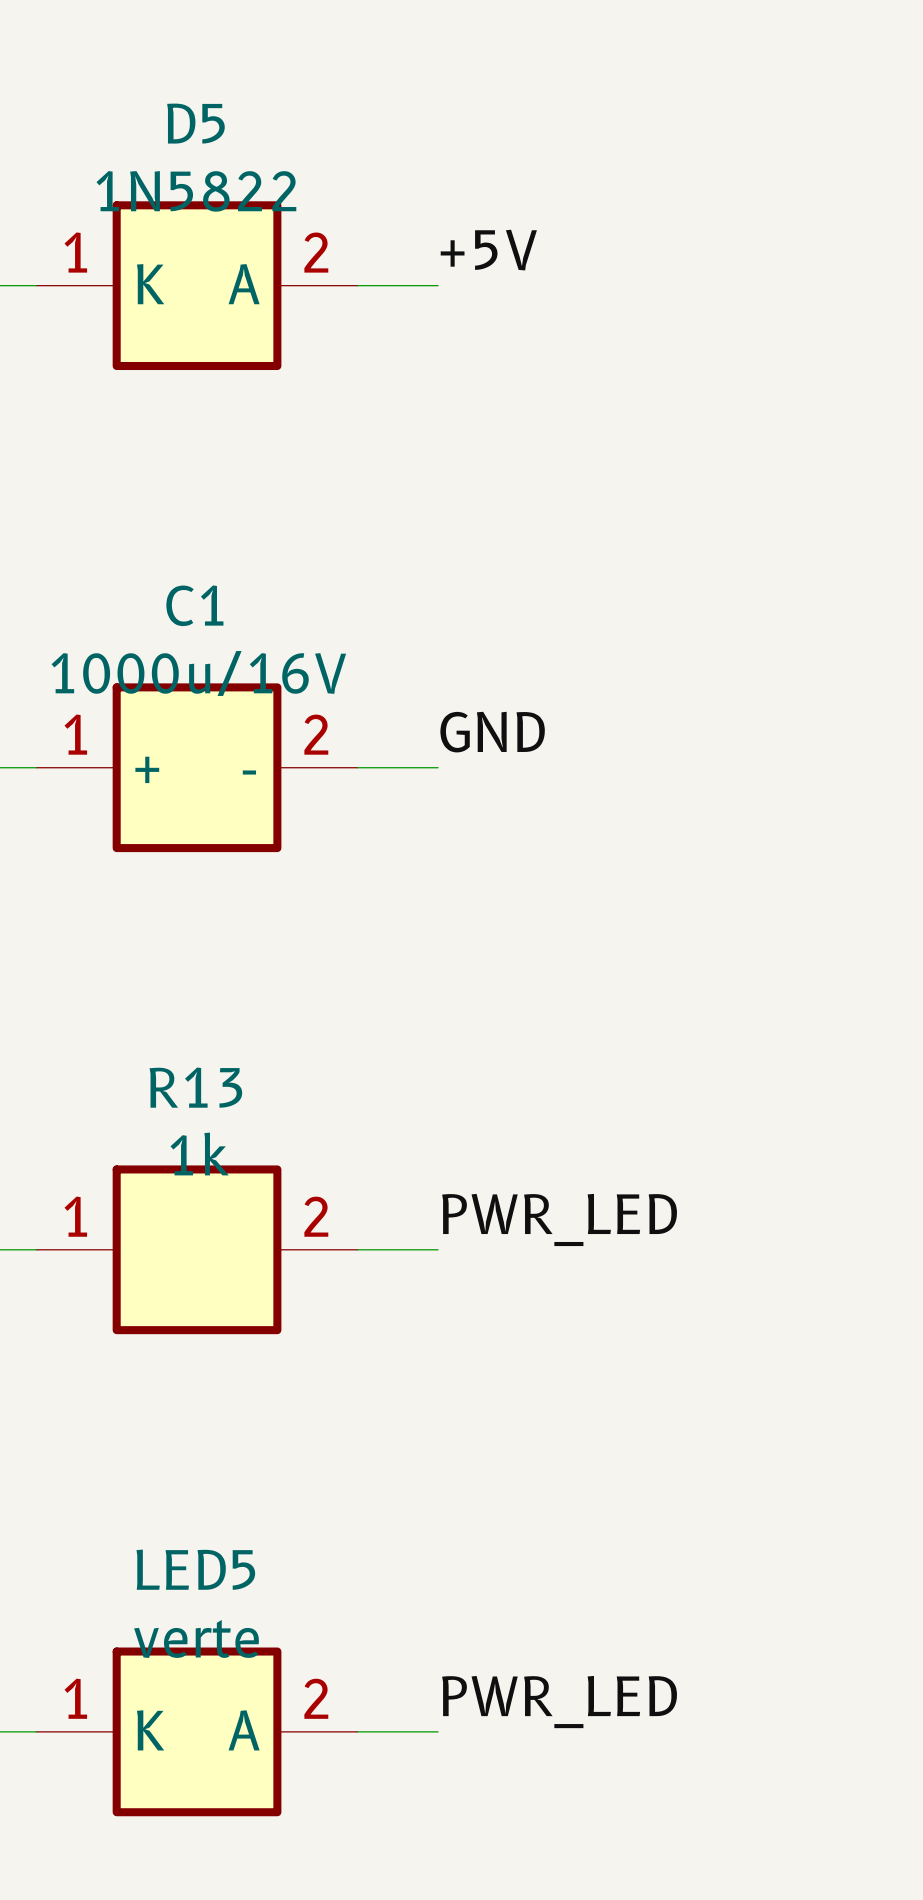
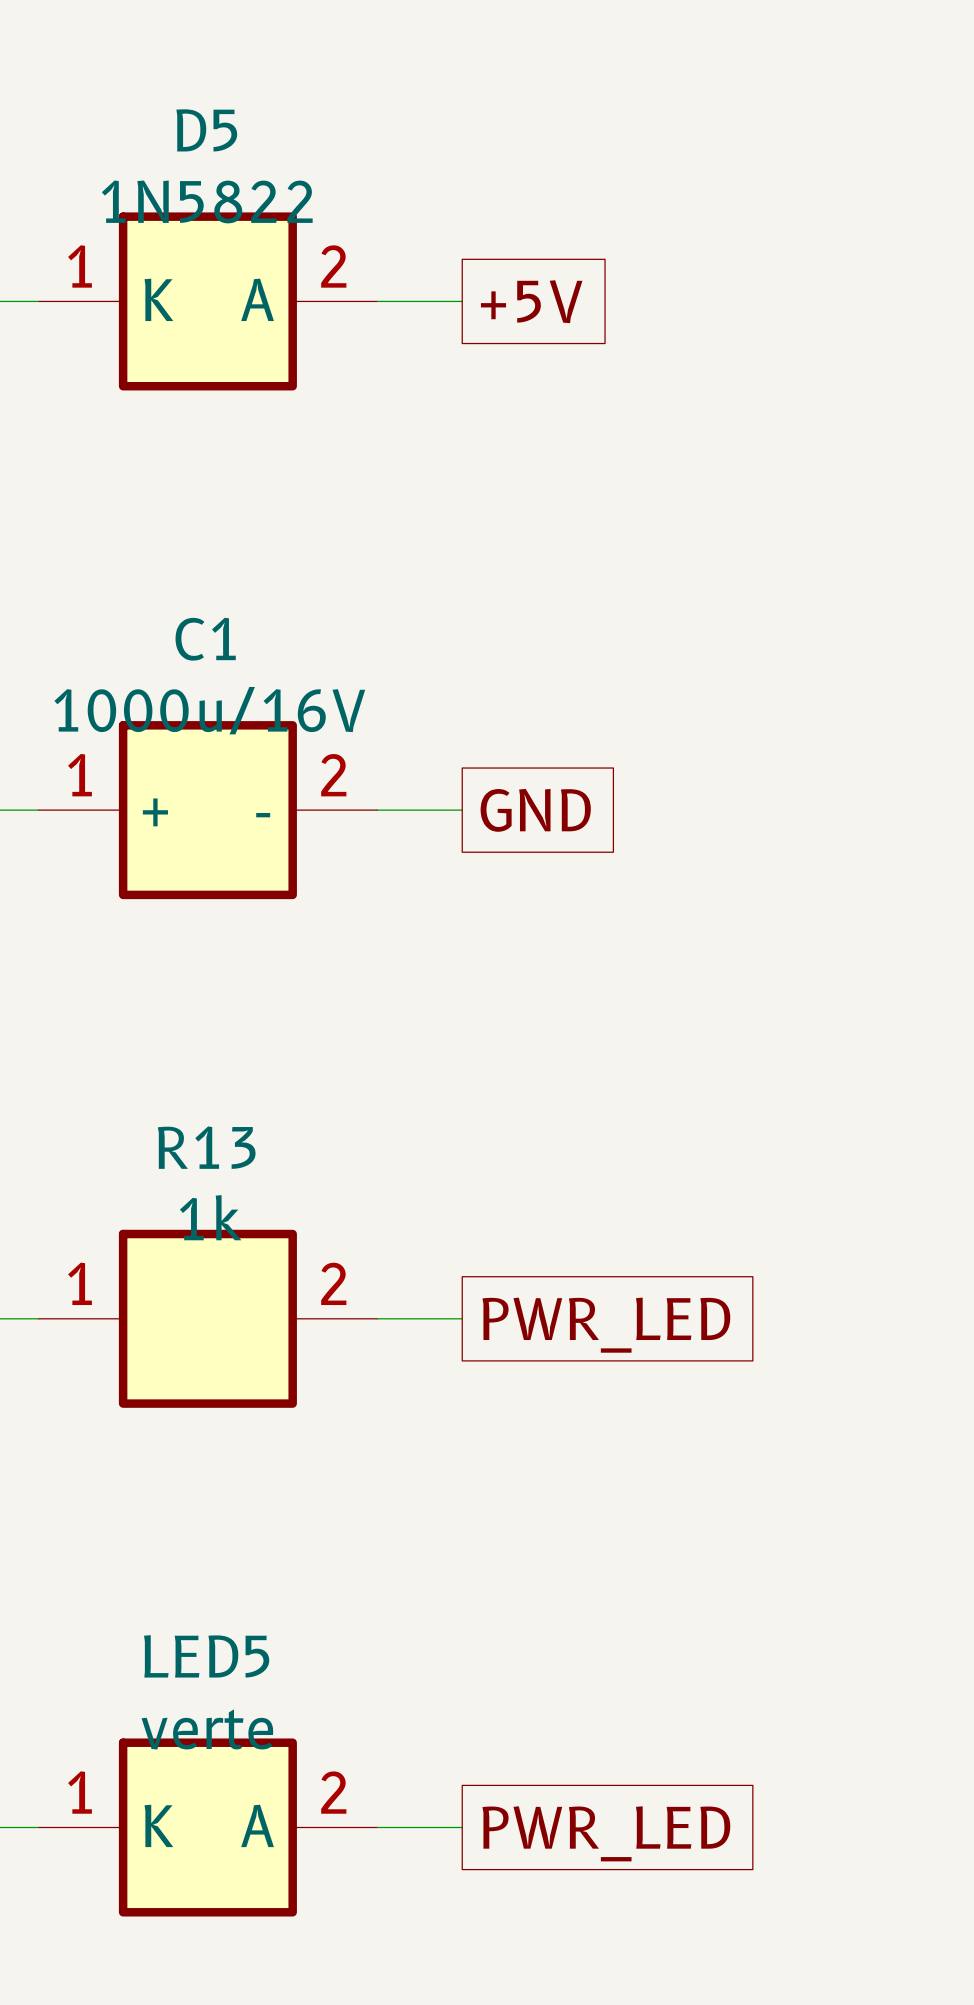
label: +5V (488, 250) -> none
global label: none -> +5V (531, 301)
label: GND (492, 732) -> none
global label: none -> GND (535, 810)
label: PWR_LED (559, 1219) -> none
global label: none -> PWR_LED (606, 1325)
label: PWR_LED (559, 1702) -> none
global label: none -> PWR_LED (606, 1833)

